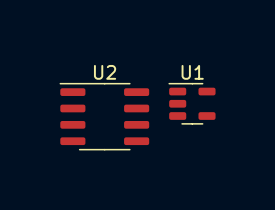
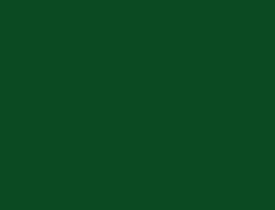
U1: (191, 103) -> none
U2: (104, 116) -> none

